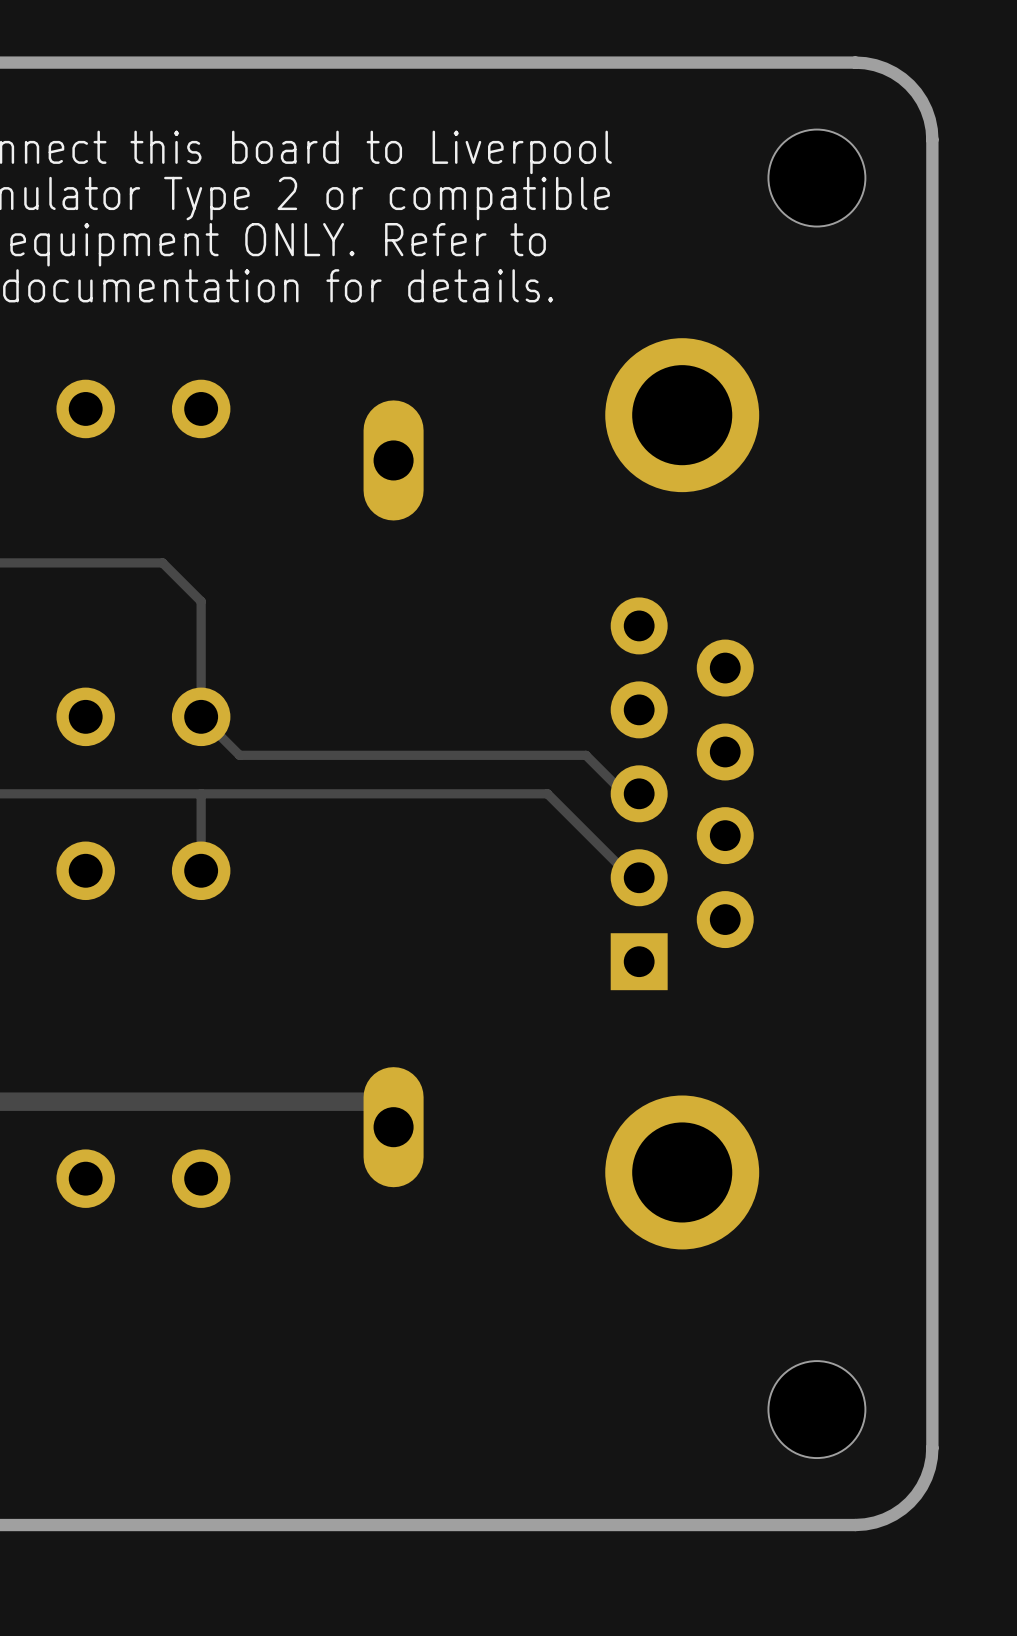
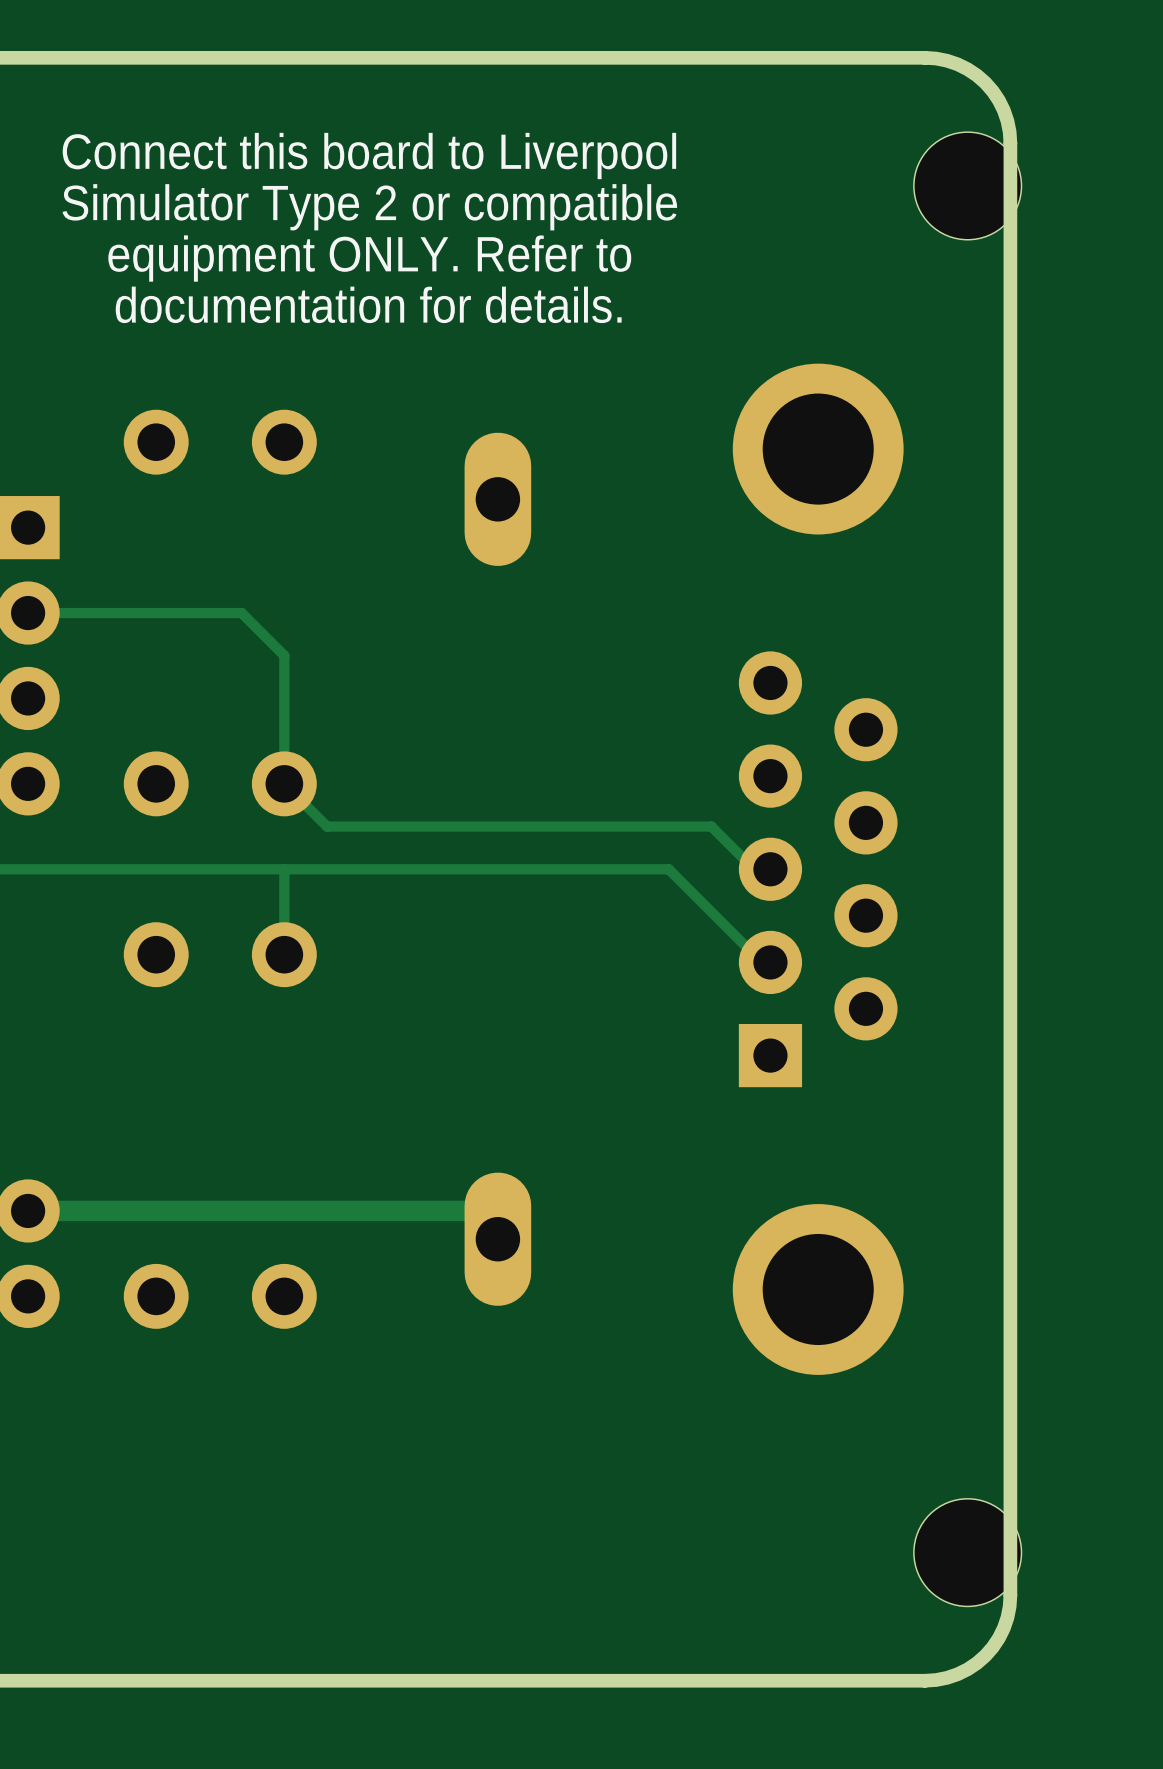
board edge: (778, 62) (865, 63) (893, 72) (909, 85) (922, 101) (929, 119) (932, 139) (931, 1458) (926, 1477) (916, 1494) (902, 1509) (884, 1519) (855, 1525) (778, 1525) -> (924, 57) (957, 64) (985, 82) (1003, 110) (1010, 143) (1010, 1595) (1003, 1628) (985, 1655) (957, 1674) (924, 1680)

